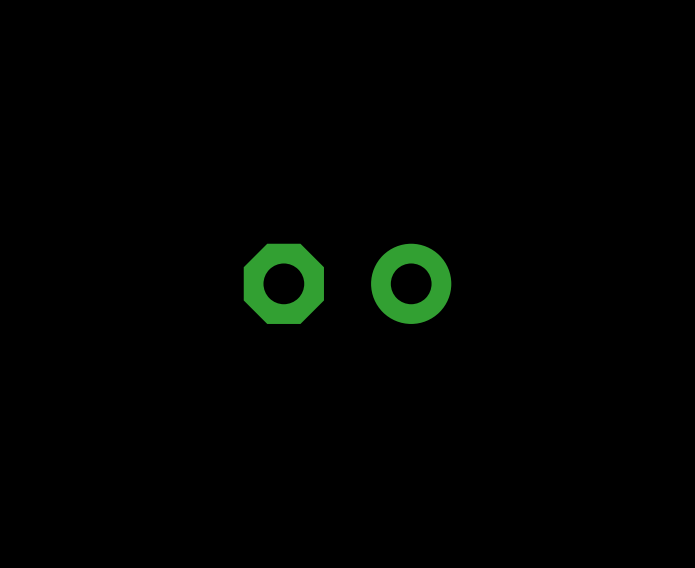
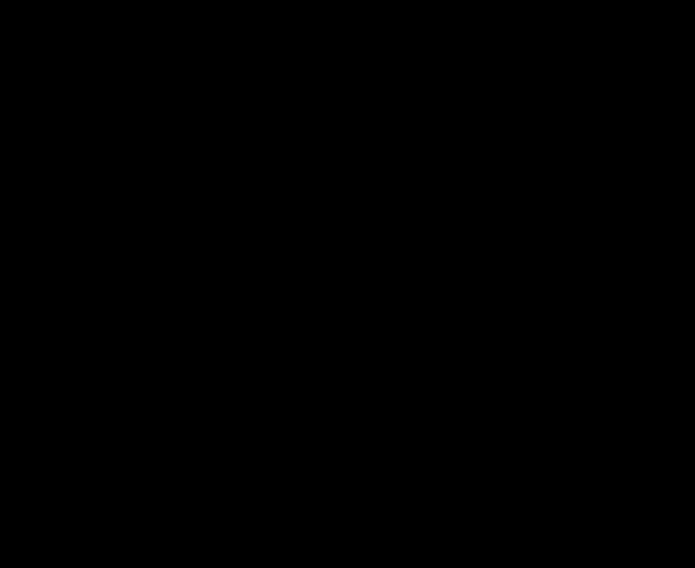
part: (347, 283) -> none

